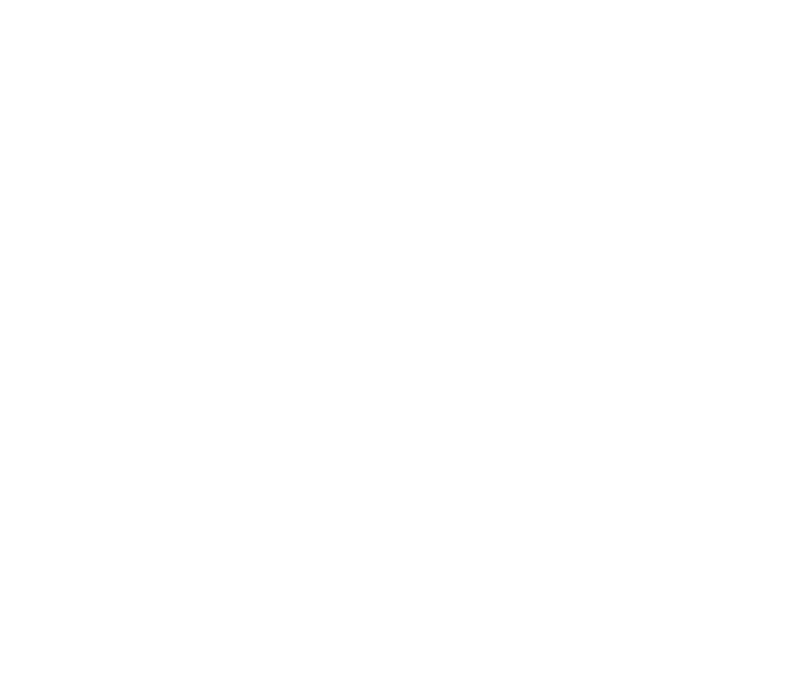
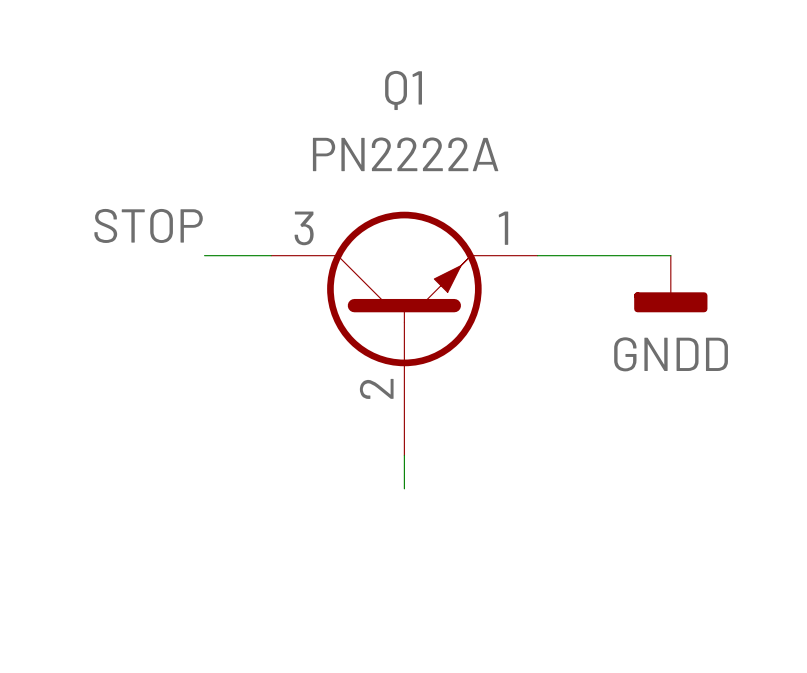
label: none -> STOP (148, 225)
wire: none -> (204, 255) (271, 255)
wire: none -> (537, 255) (670, 255)
power symbol: none -> GNDD (670, 283)
Q1: none -> PN2222A (404, 333)
wire: none -> (404, 455) (404, 488)

